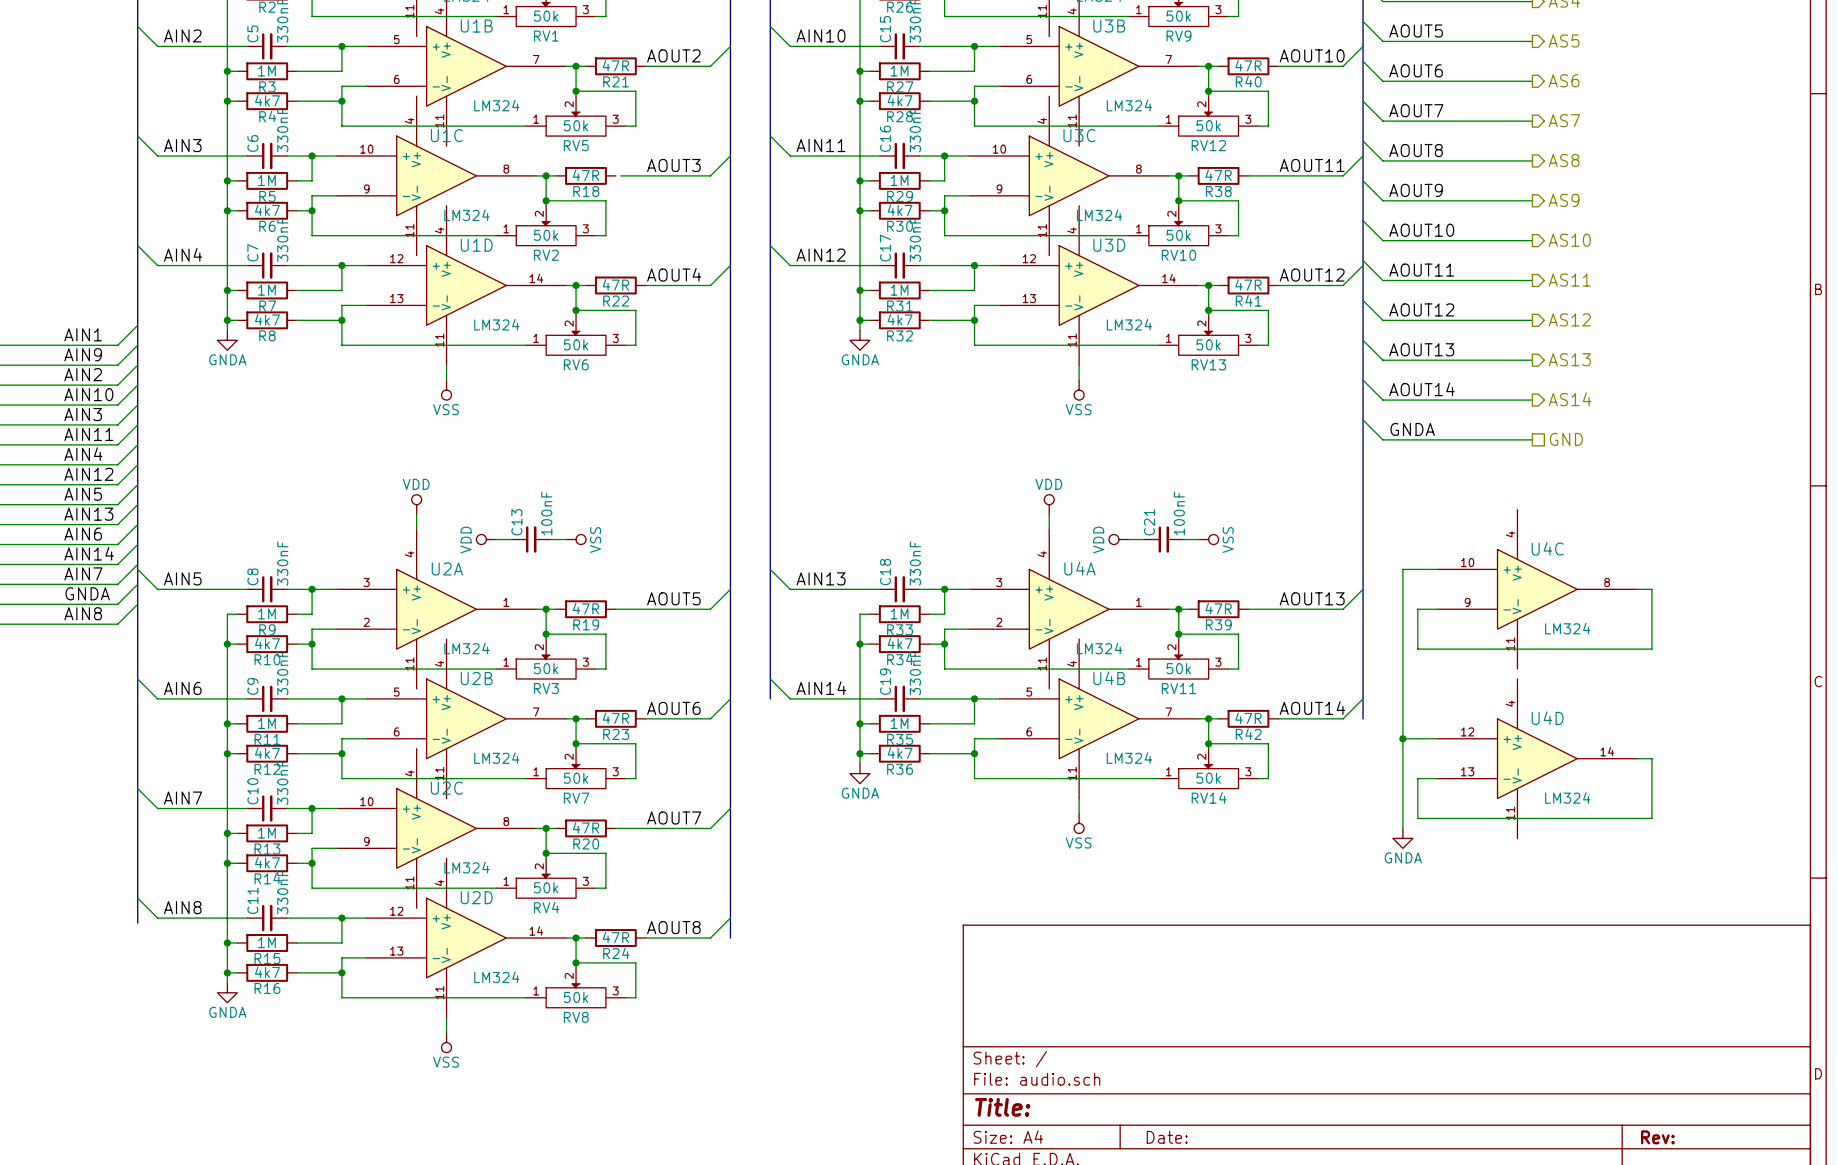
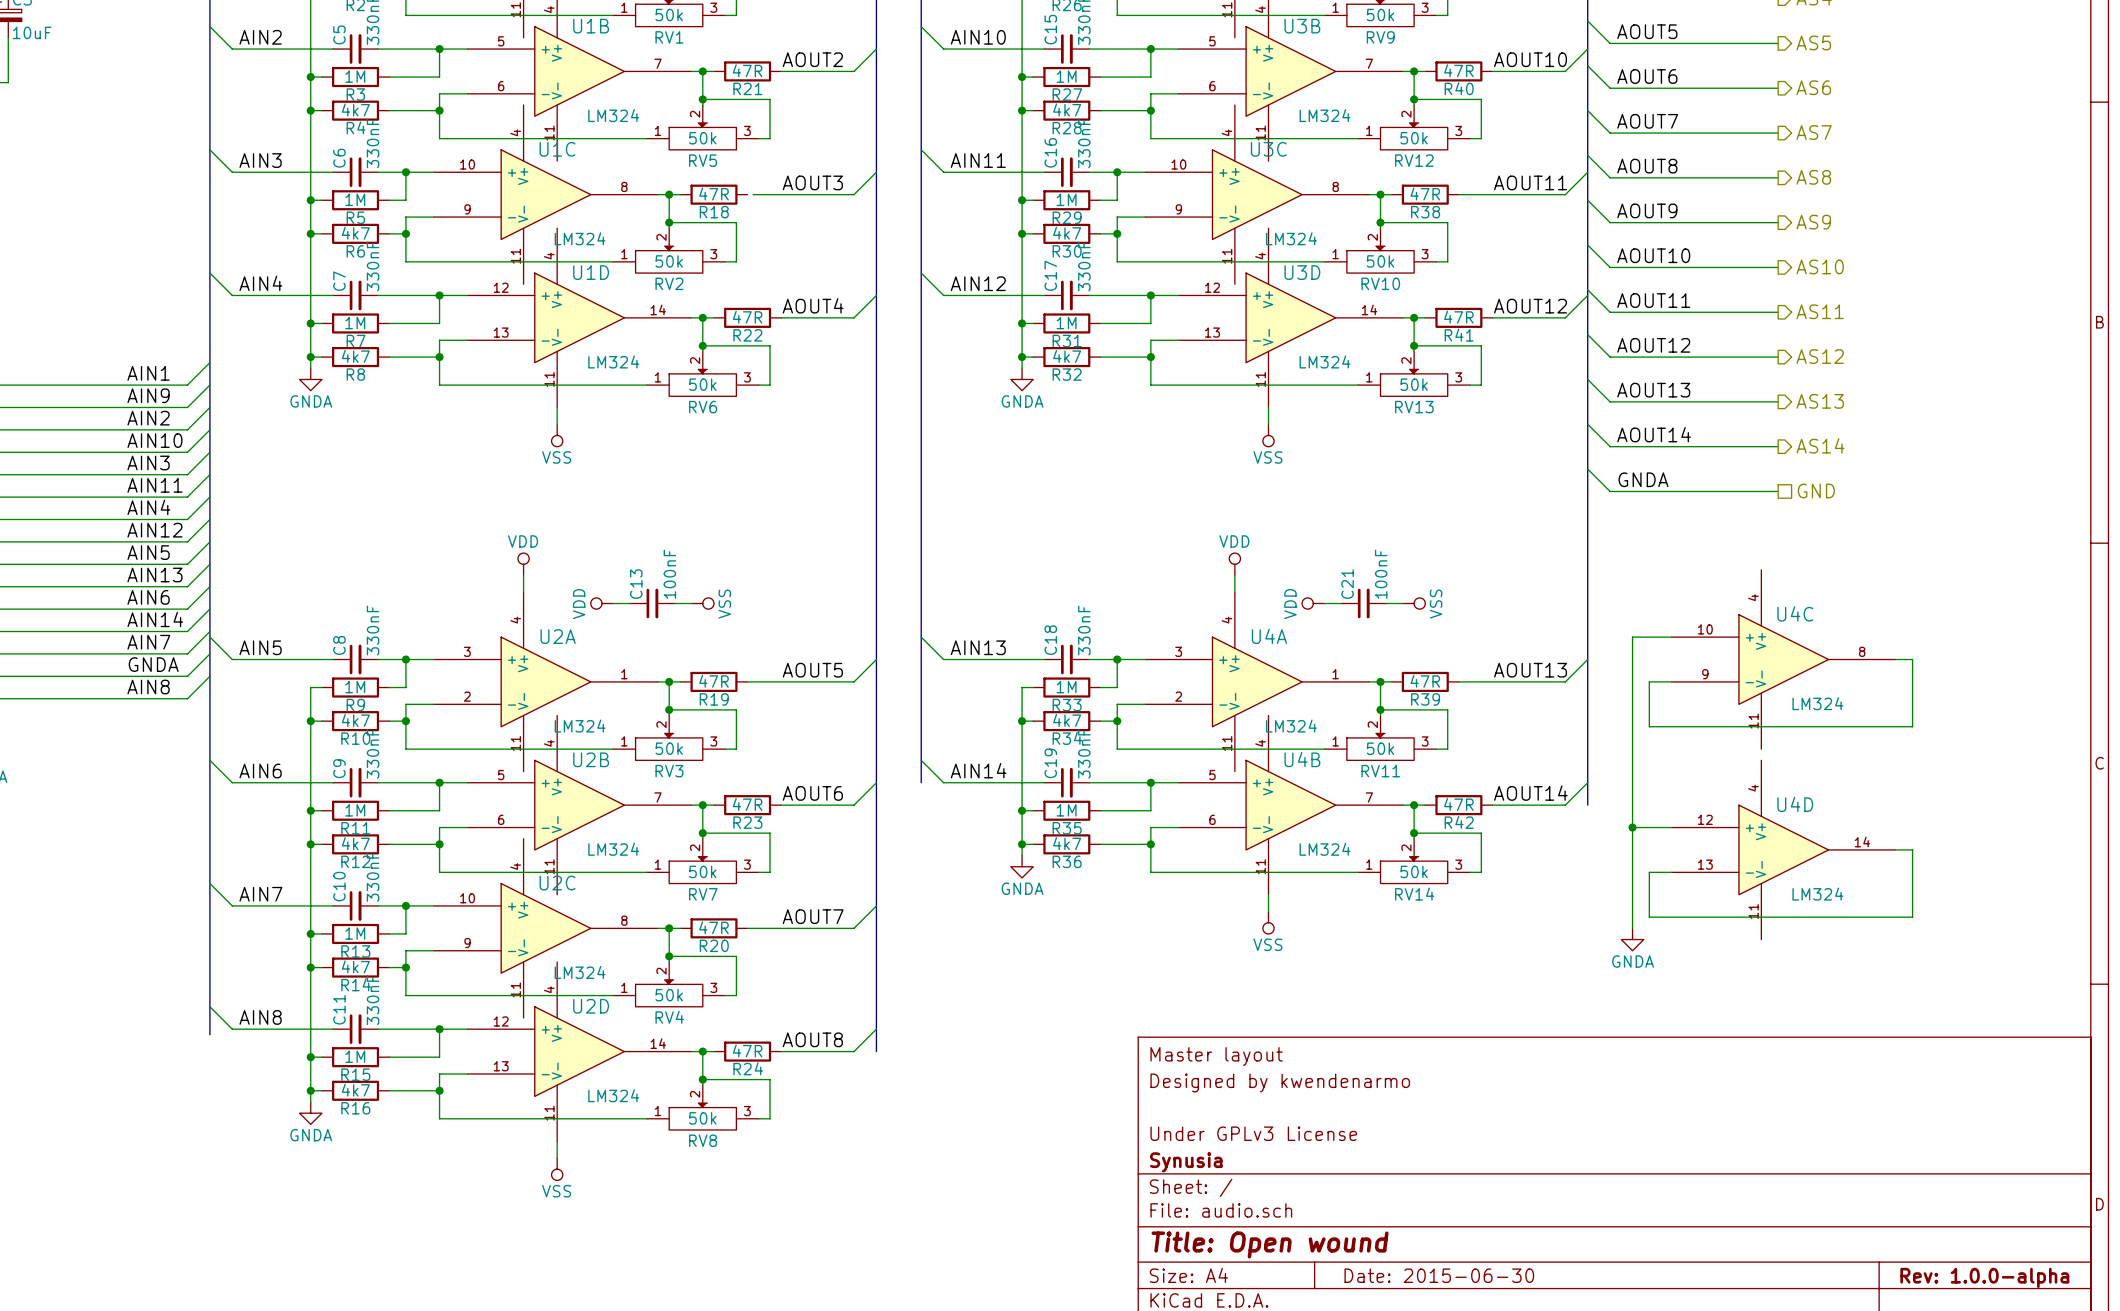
title block: none -> Master layout (1216, 1056)
title block: none -> Designed by kwendenarmo (1280, 1082)
title block: none -> Under GPLv3 License (1253, 1133)
title block: none -> Synusia (1186, 1162)
title block: Title: (1002, 1107) -> Title: Open wound (1270, 1244)
title block: Date: (1167, 1137) -> Date: 2015-06-30 (1439, 1275)
title block: Rev: (1657, 1137) -> Rev: 1.0.0-alpha (1984, 1277)

